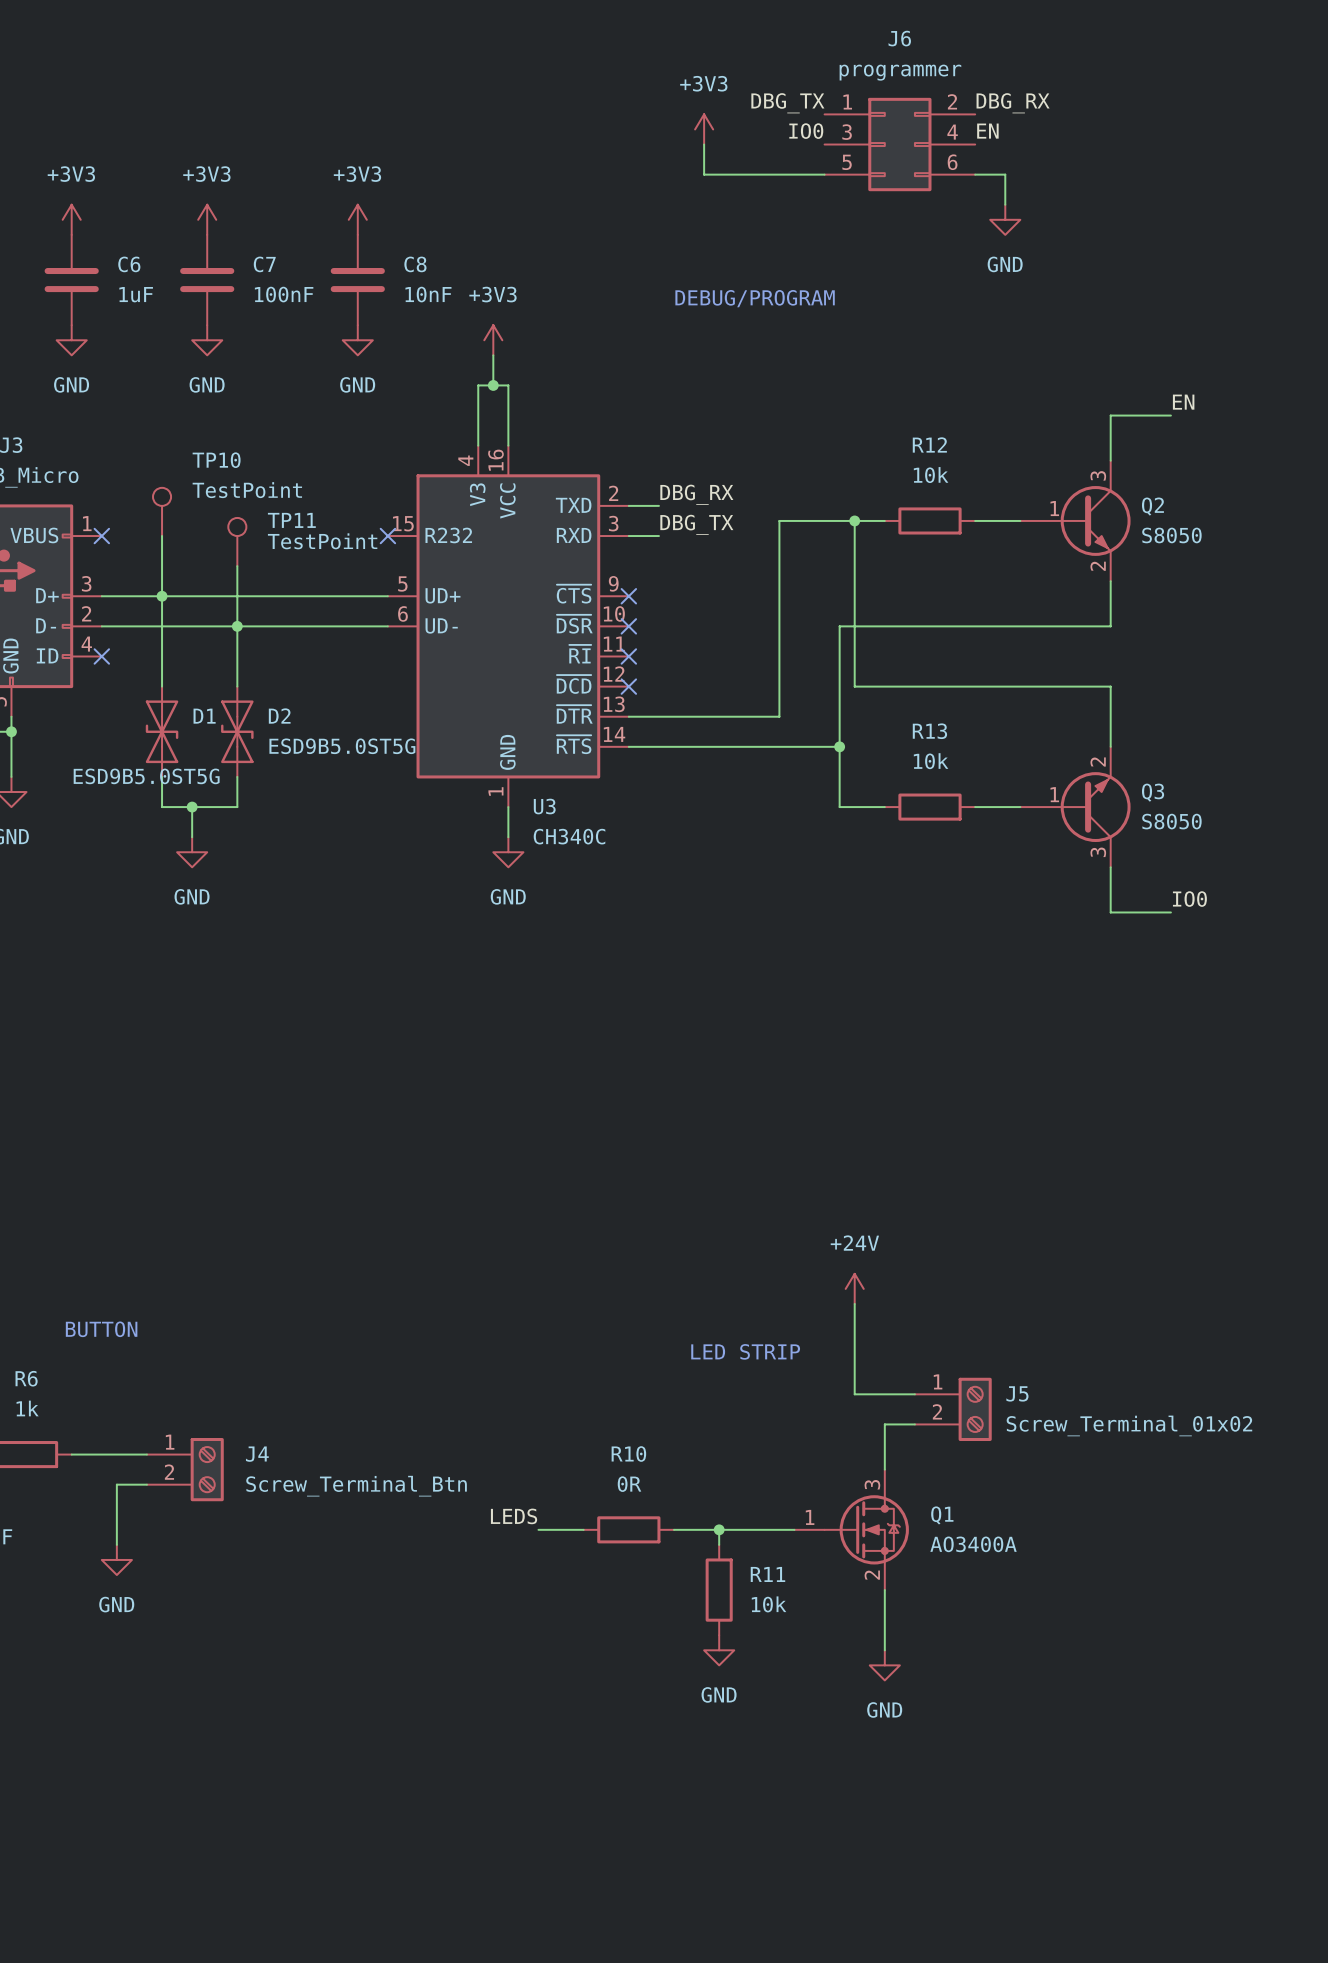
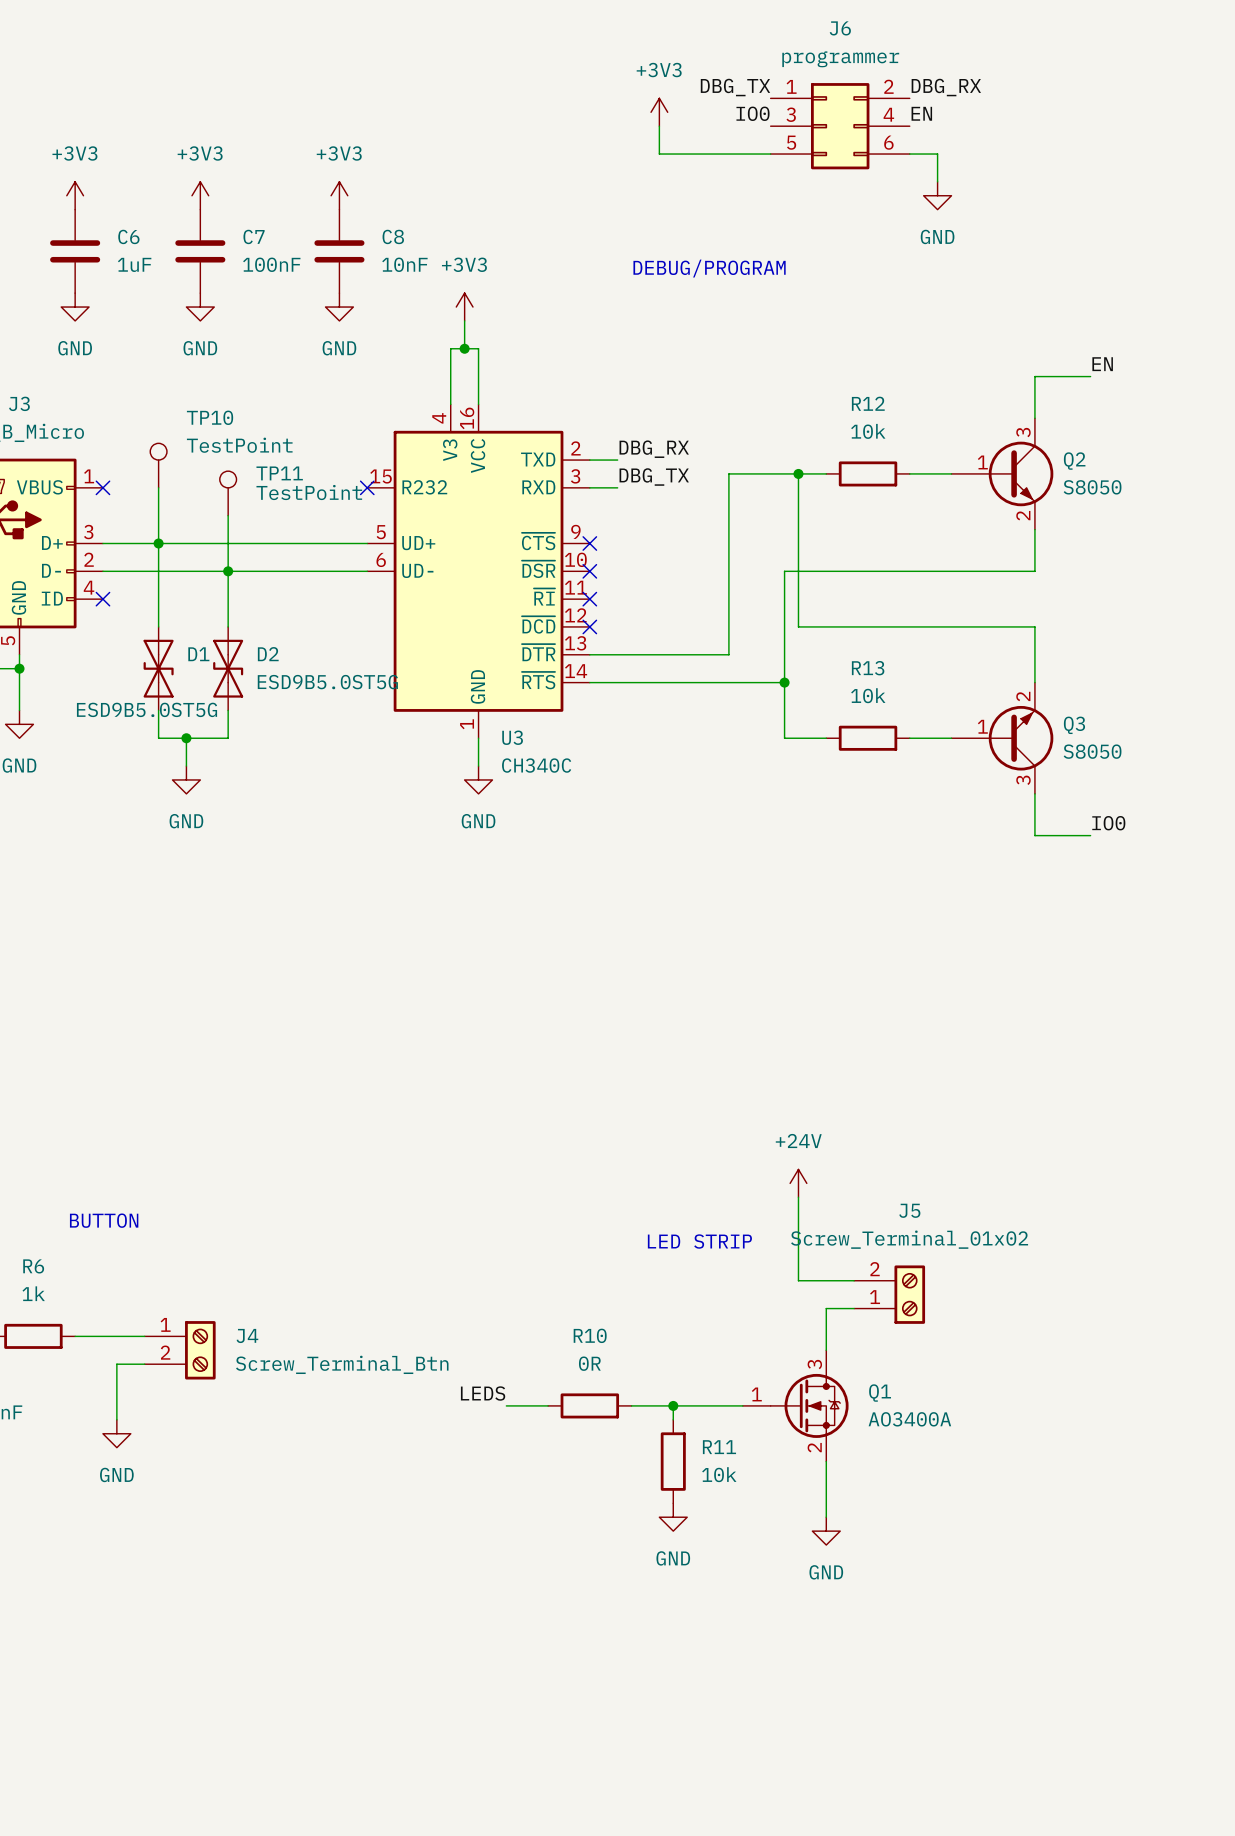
J5 name position: J5 (1017, 1393) -> J5 (909, 1210)
J5 flip: as is (975, 1409) -> up-down (909, 1294)
J5 value position: Screw_Terminal_01x02 (1129, 1425) -> Screw_Terminal_01x02 (909, 1239)

